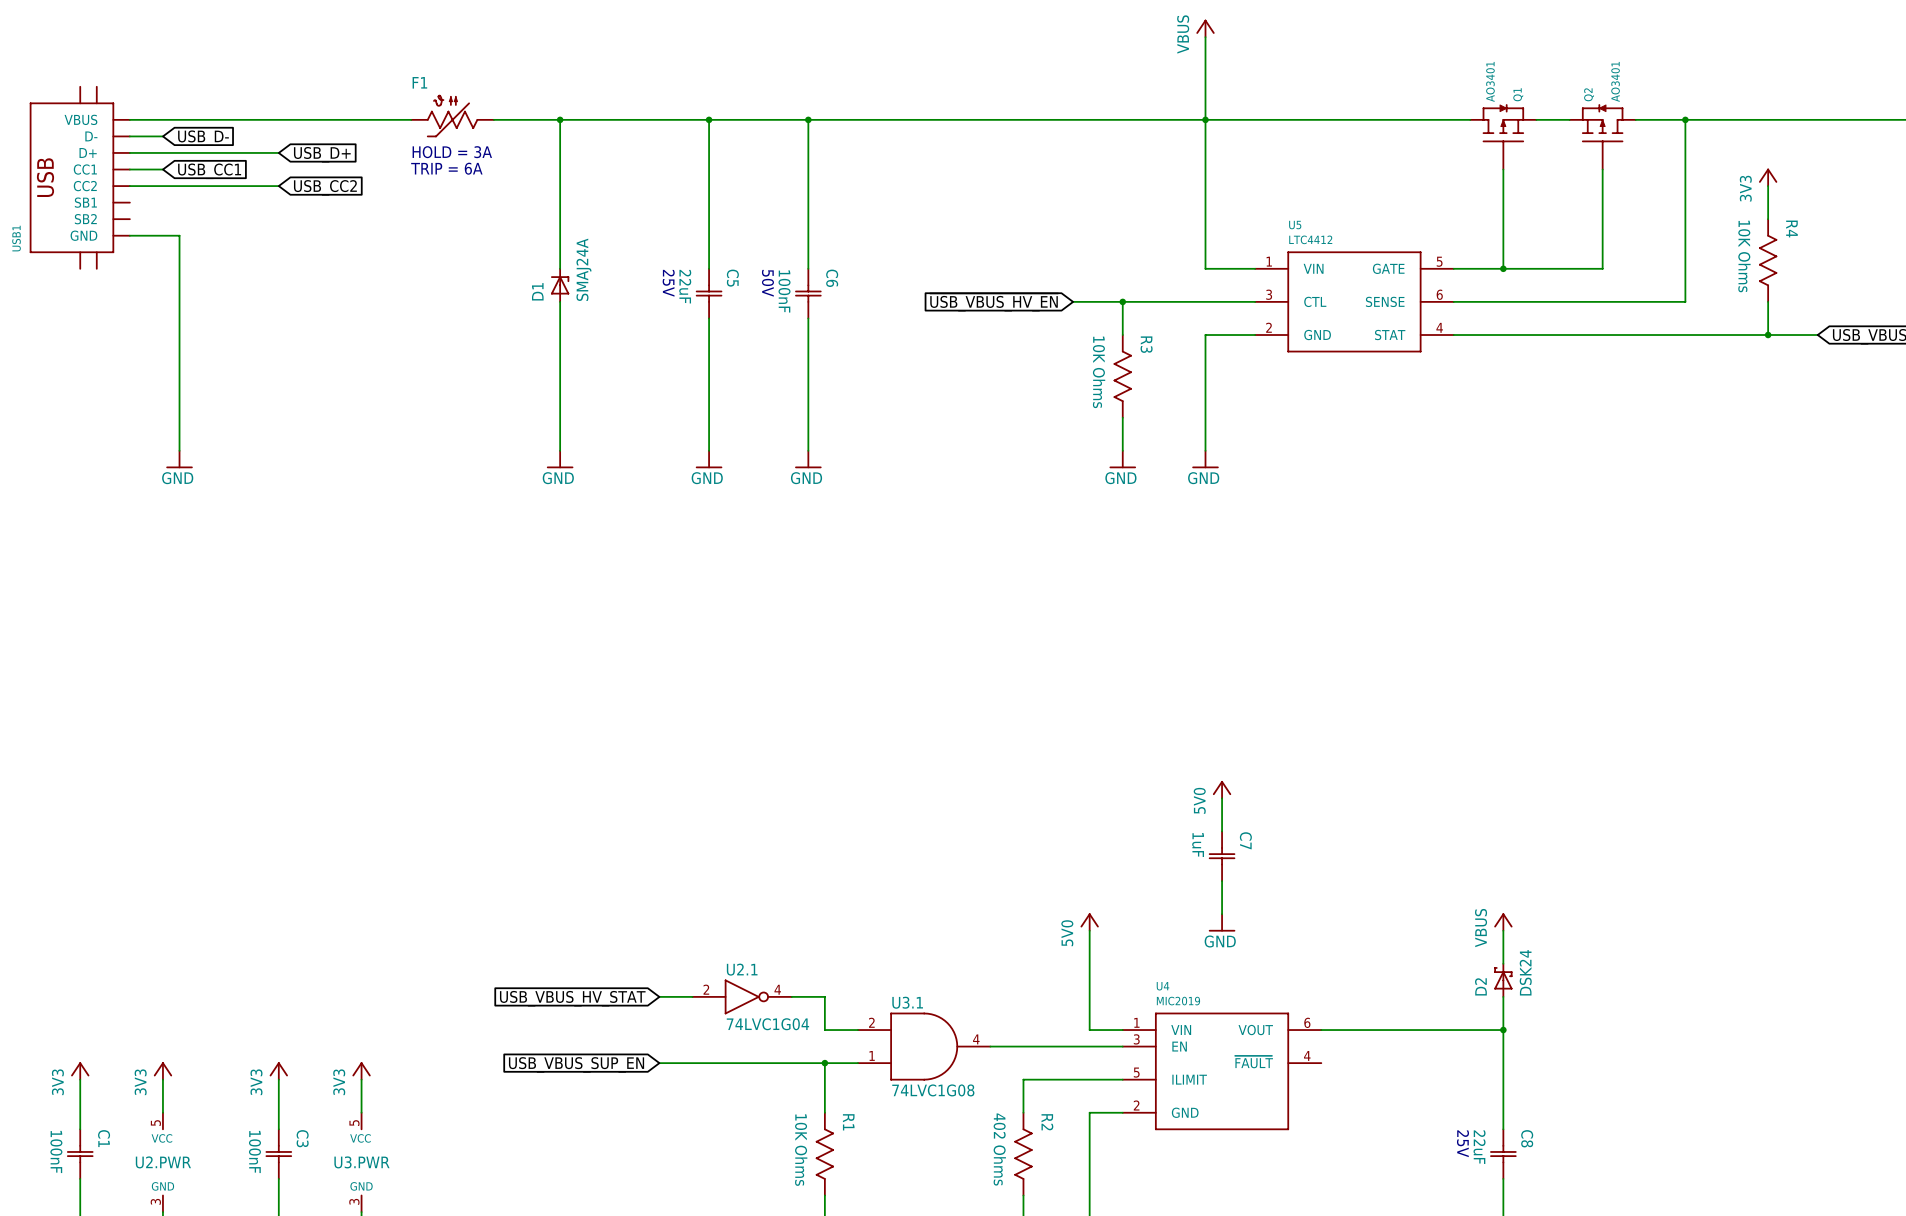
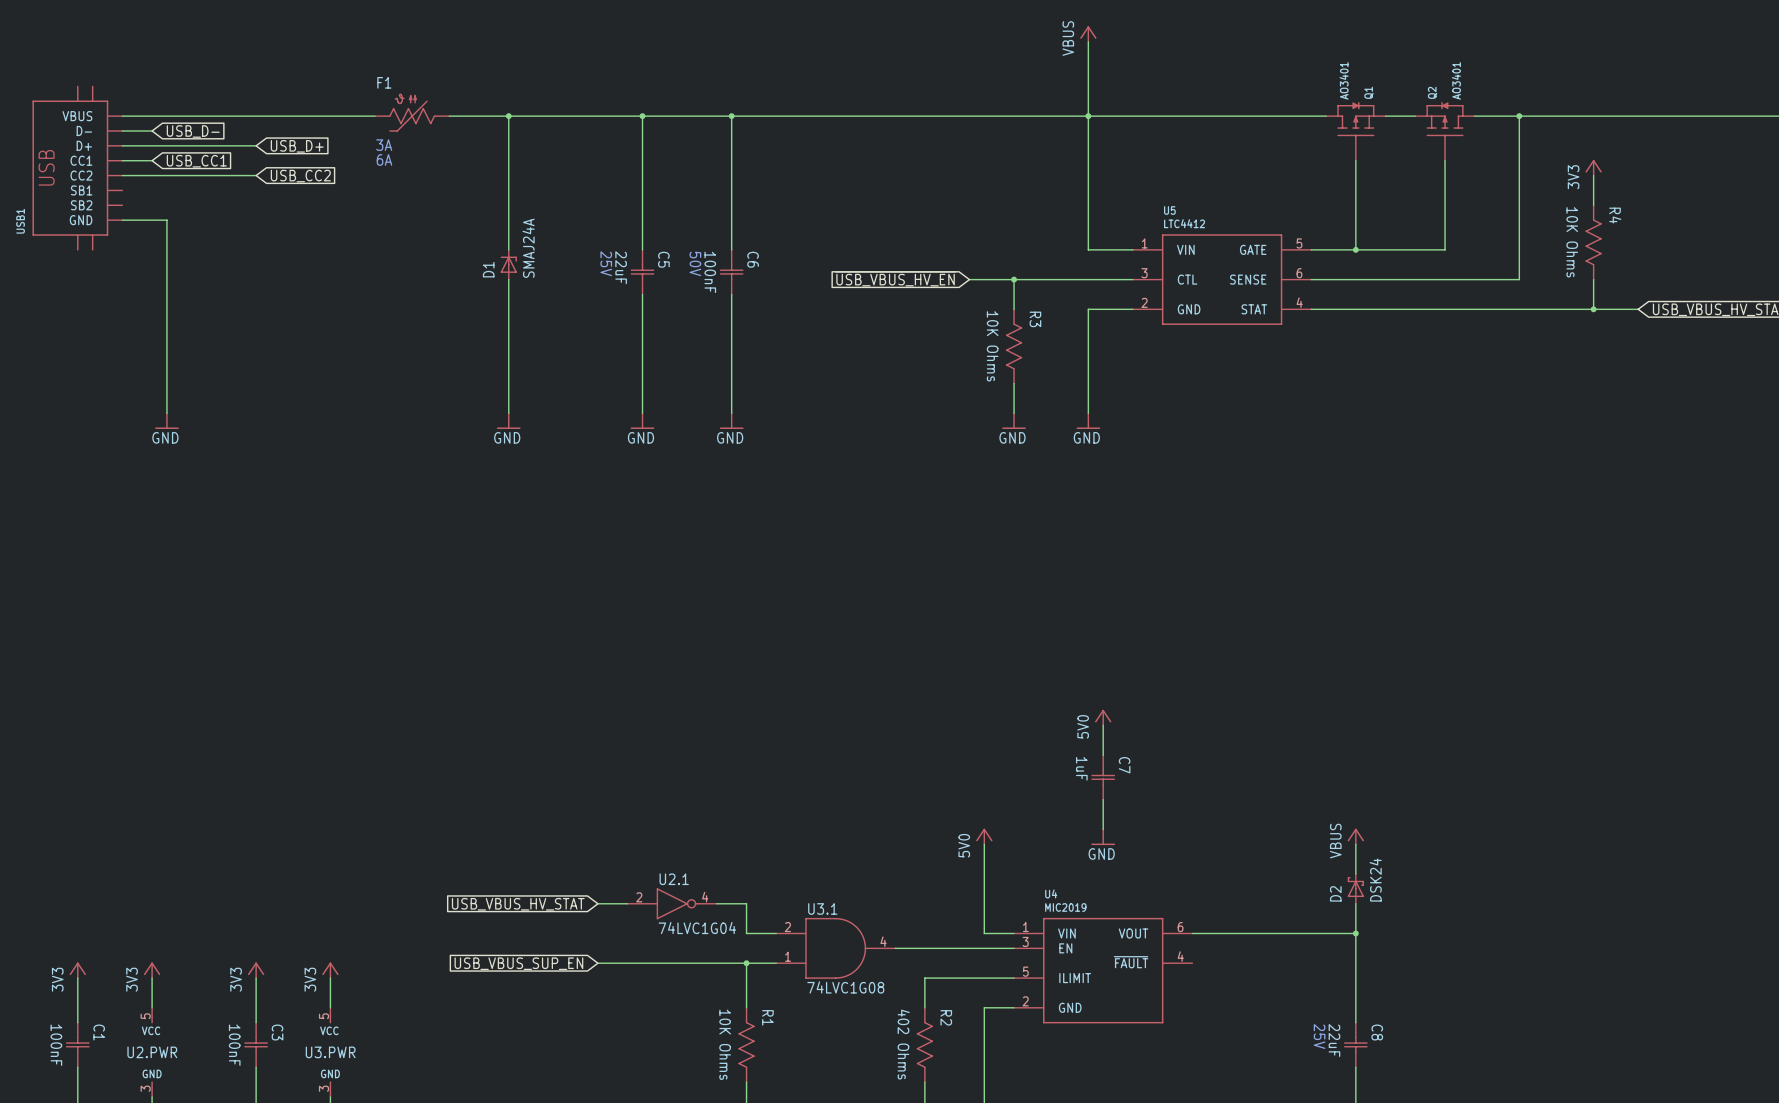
F1 text: HOLD = 3A (452, 152) -> 3A (384, 145)
F1 text: TRIP = 6A (446, 168) -> 6A (384, 159)

